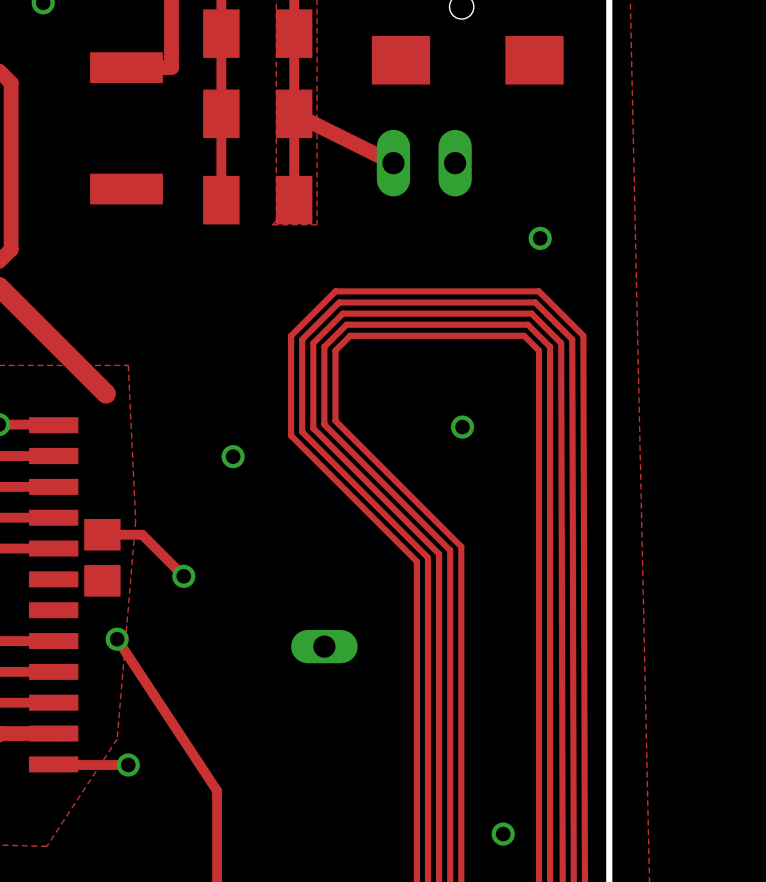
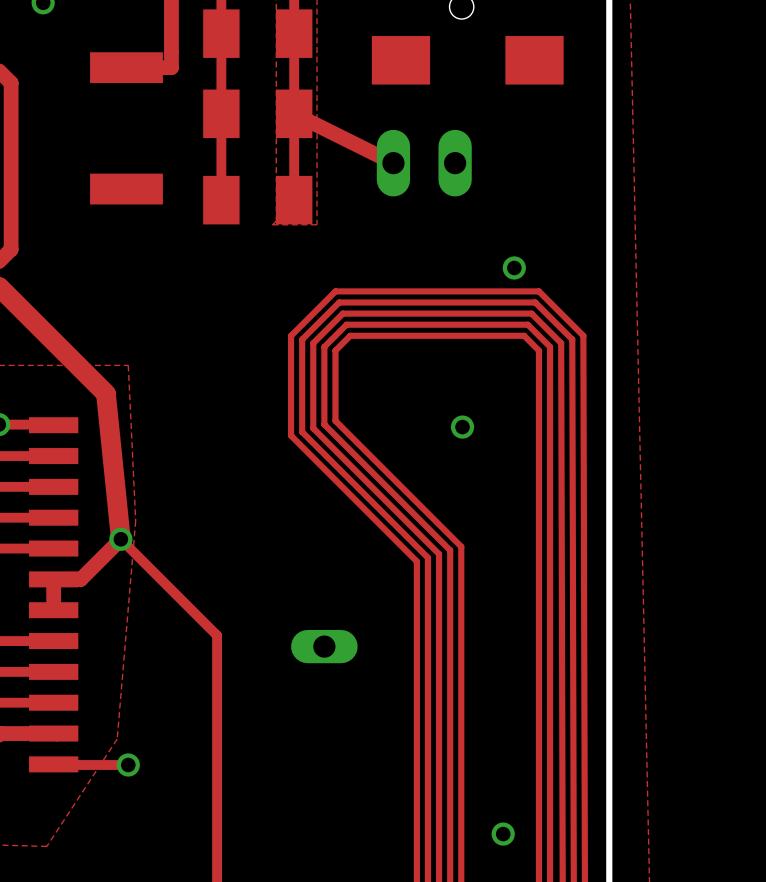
via position: (540, 238) -> (514, 267)
top track: none -> (106, 395) (120, 539)
via: (233, 456) -> none
top track: (102, 534) (142, 534) (183, 576) -> none
top track: none -> (120, 539) (80, 579) (53, 579) (53, 610)
via: none -> (120, 539)
part: (102, 557) -> none
via: (183, 576) -> none
top track: (117, 639) (217, 790) -> (120, 539) (217, 635) (217, 790)
via: (117, 639) -> none

